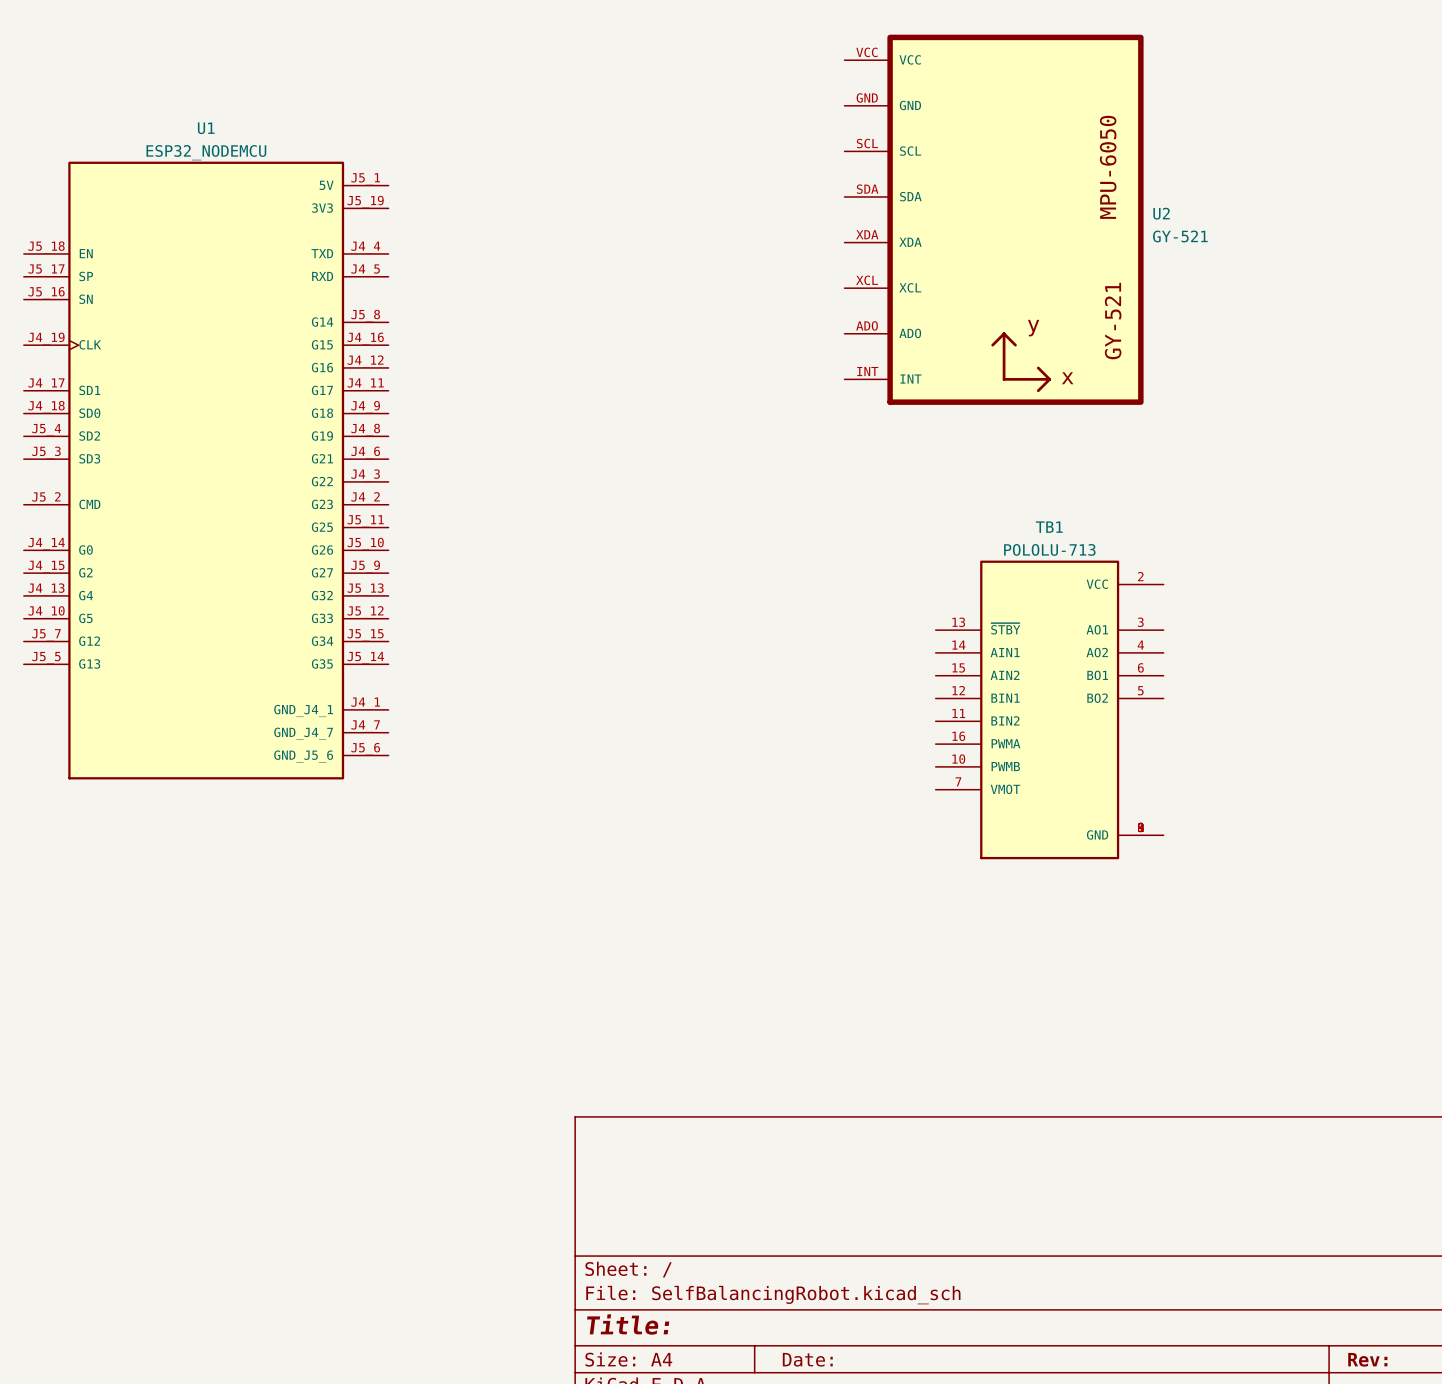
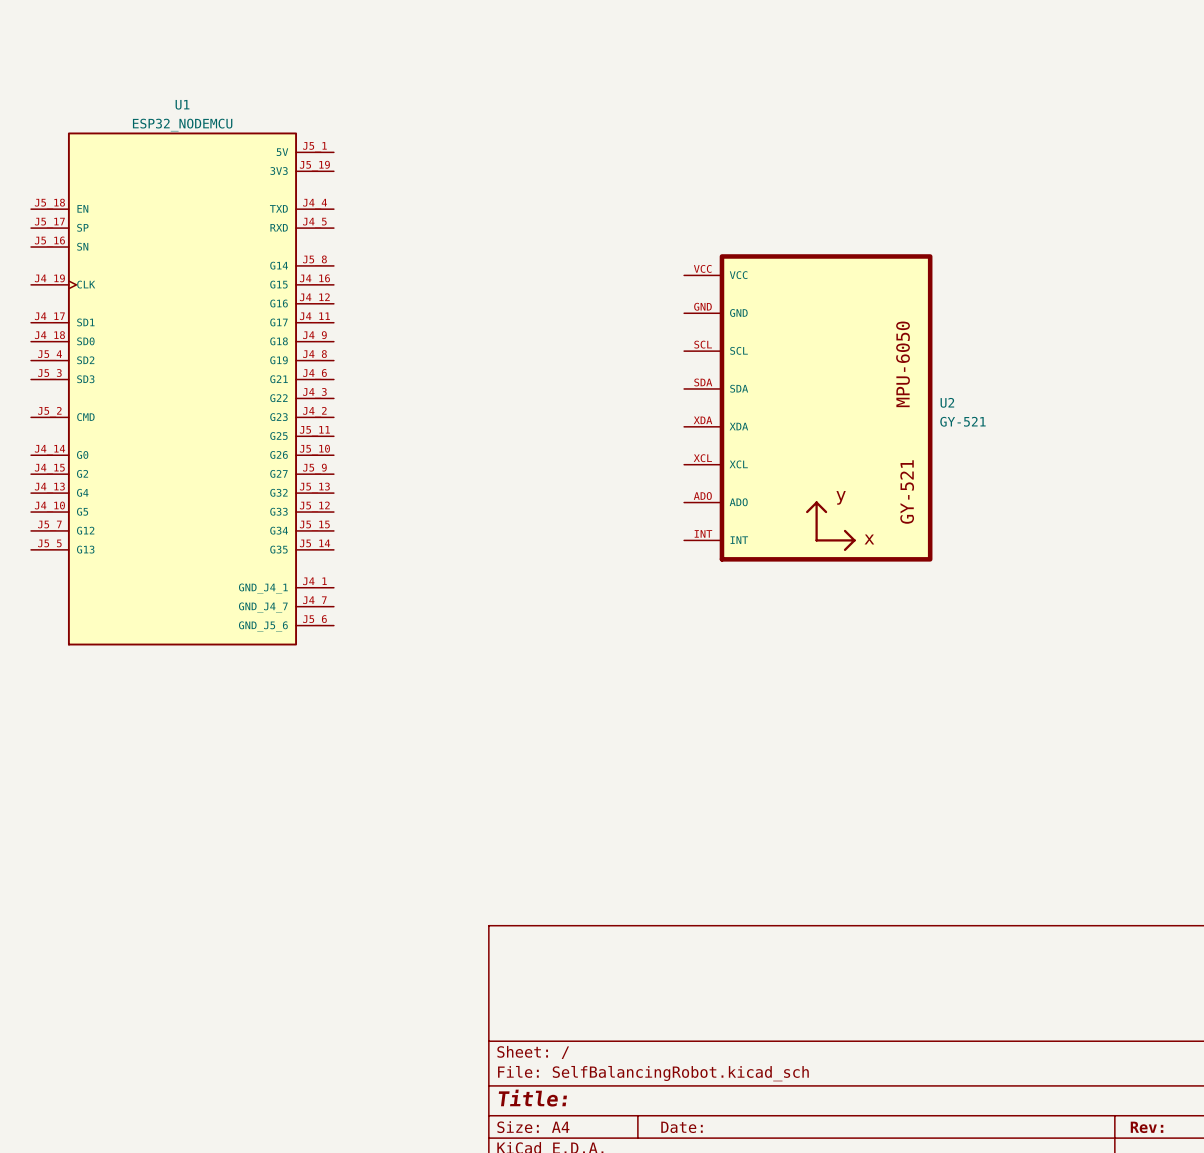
U2 position: (994, 219) -> (808, 407)
TB1: POLOLU-713 (1049, 709) -> none

